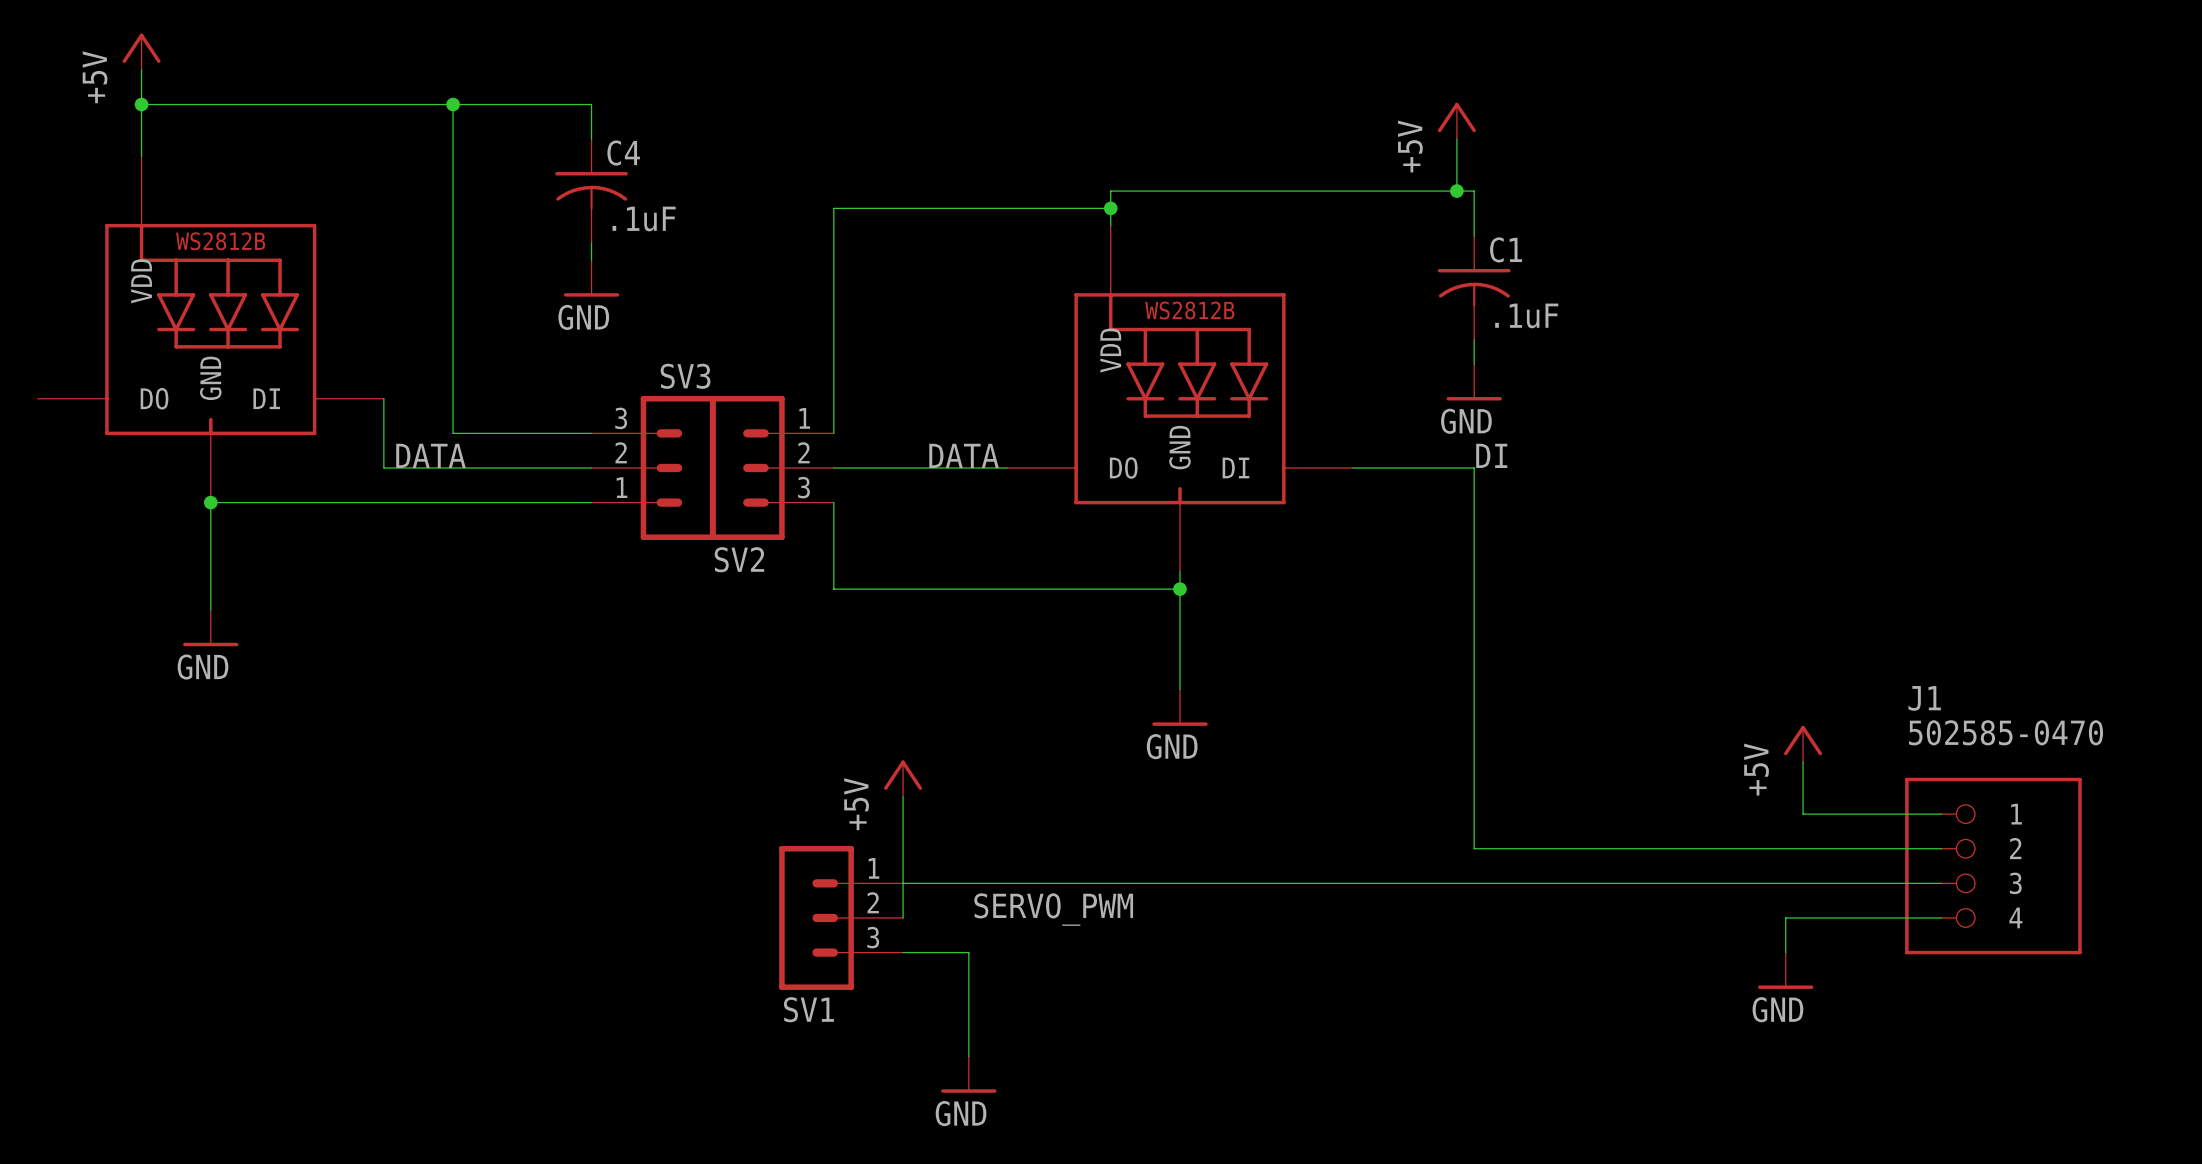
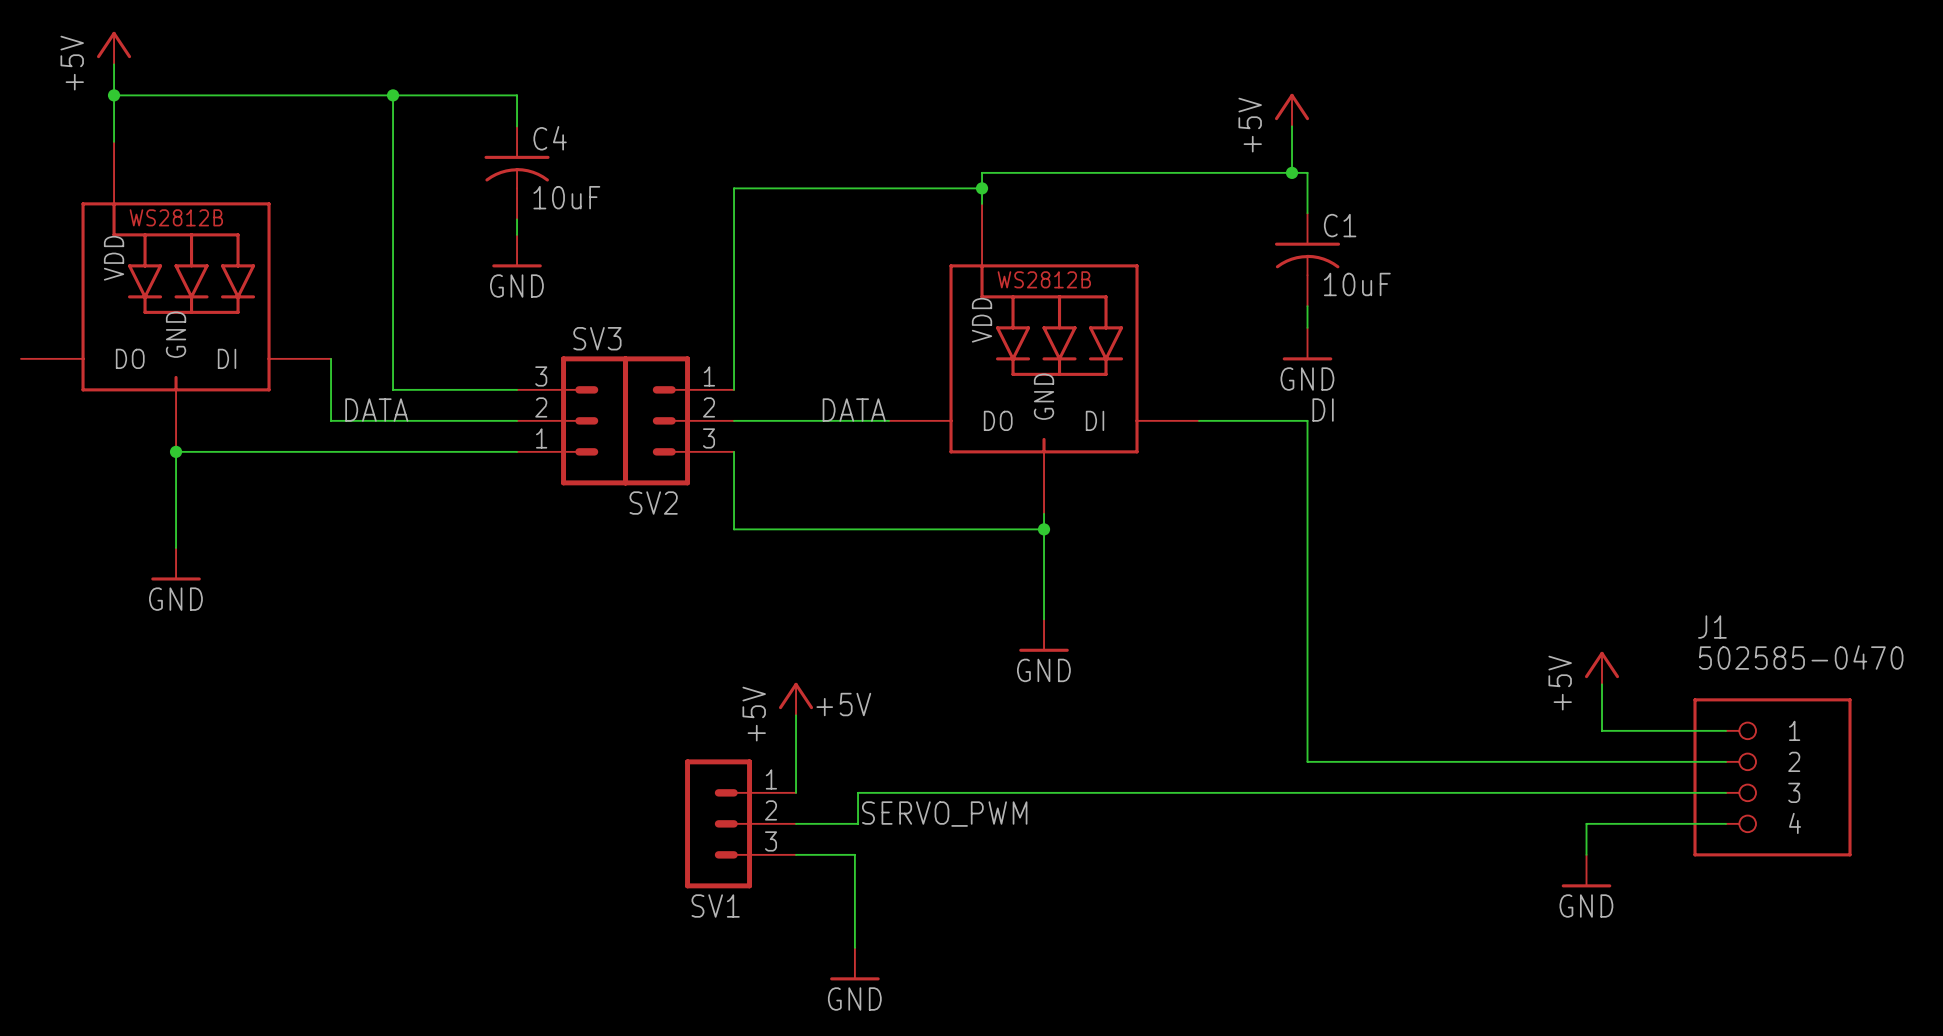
C4 value: .1uF (644, 219) -> 10uF (566, 197)
C1 value: .1uF (1526, 315) -> 10uF (1357, 284)
label: none -> +5V (843, 704)
wire: (972, 883) (903, 883) (903, 917) -> (858, 792) (858, 823) (796, 823)

